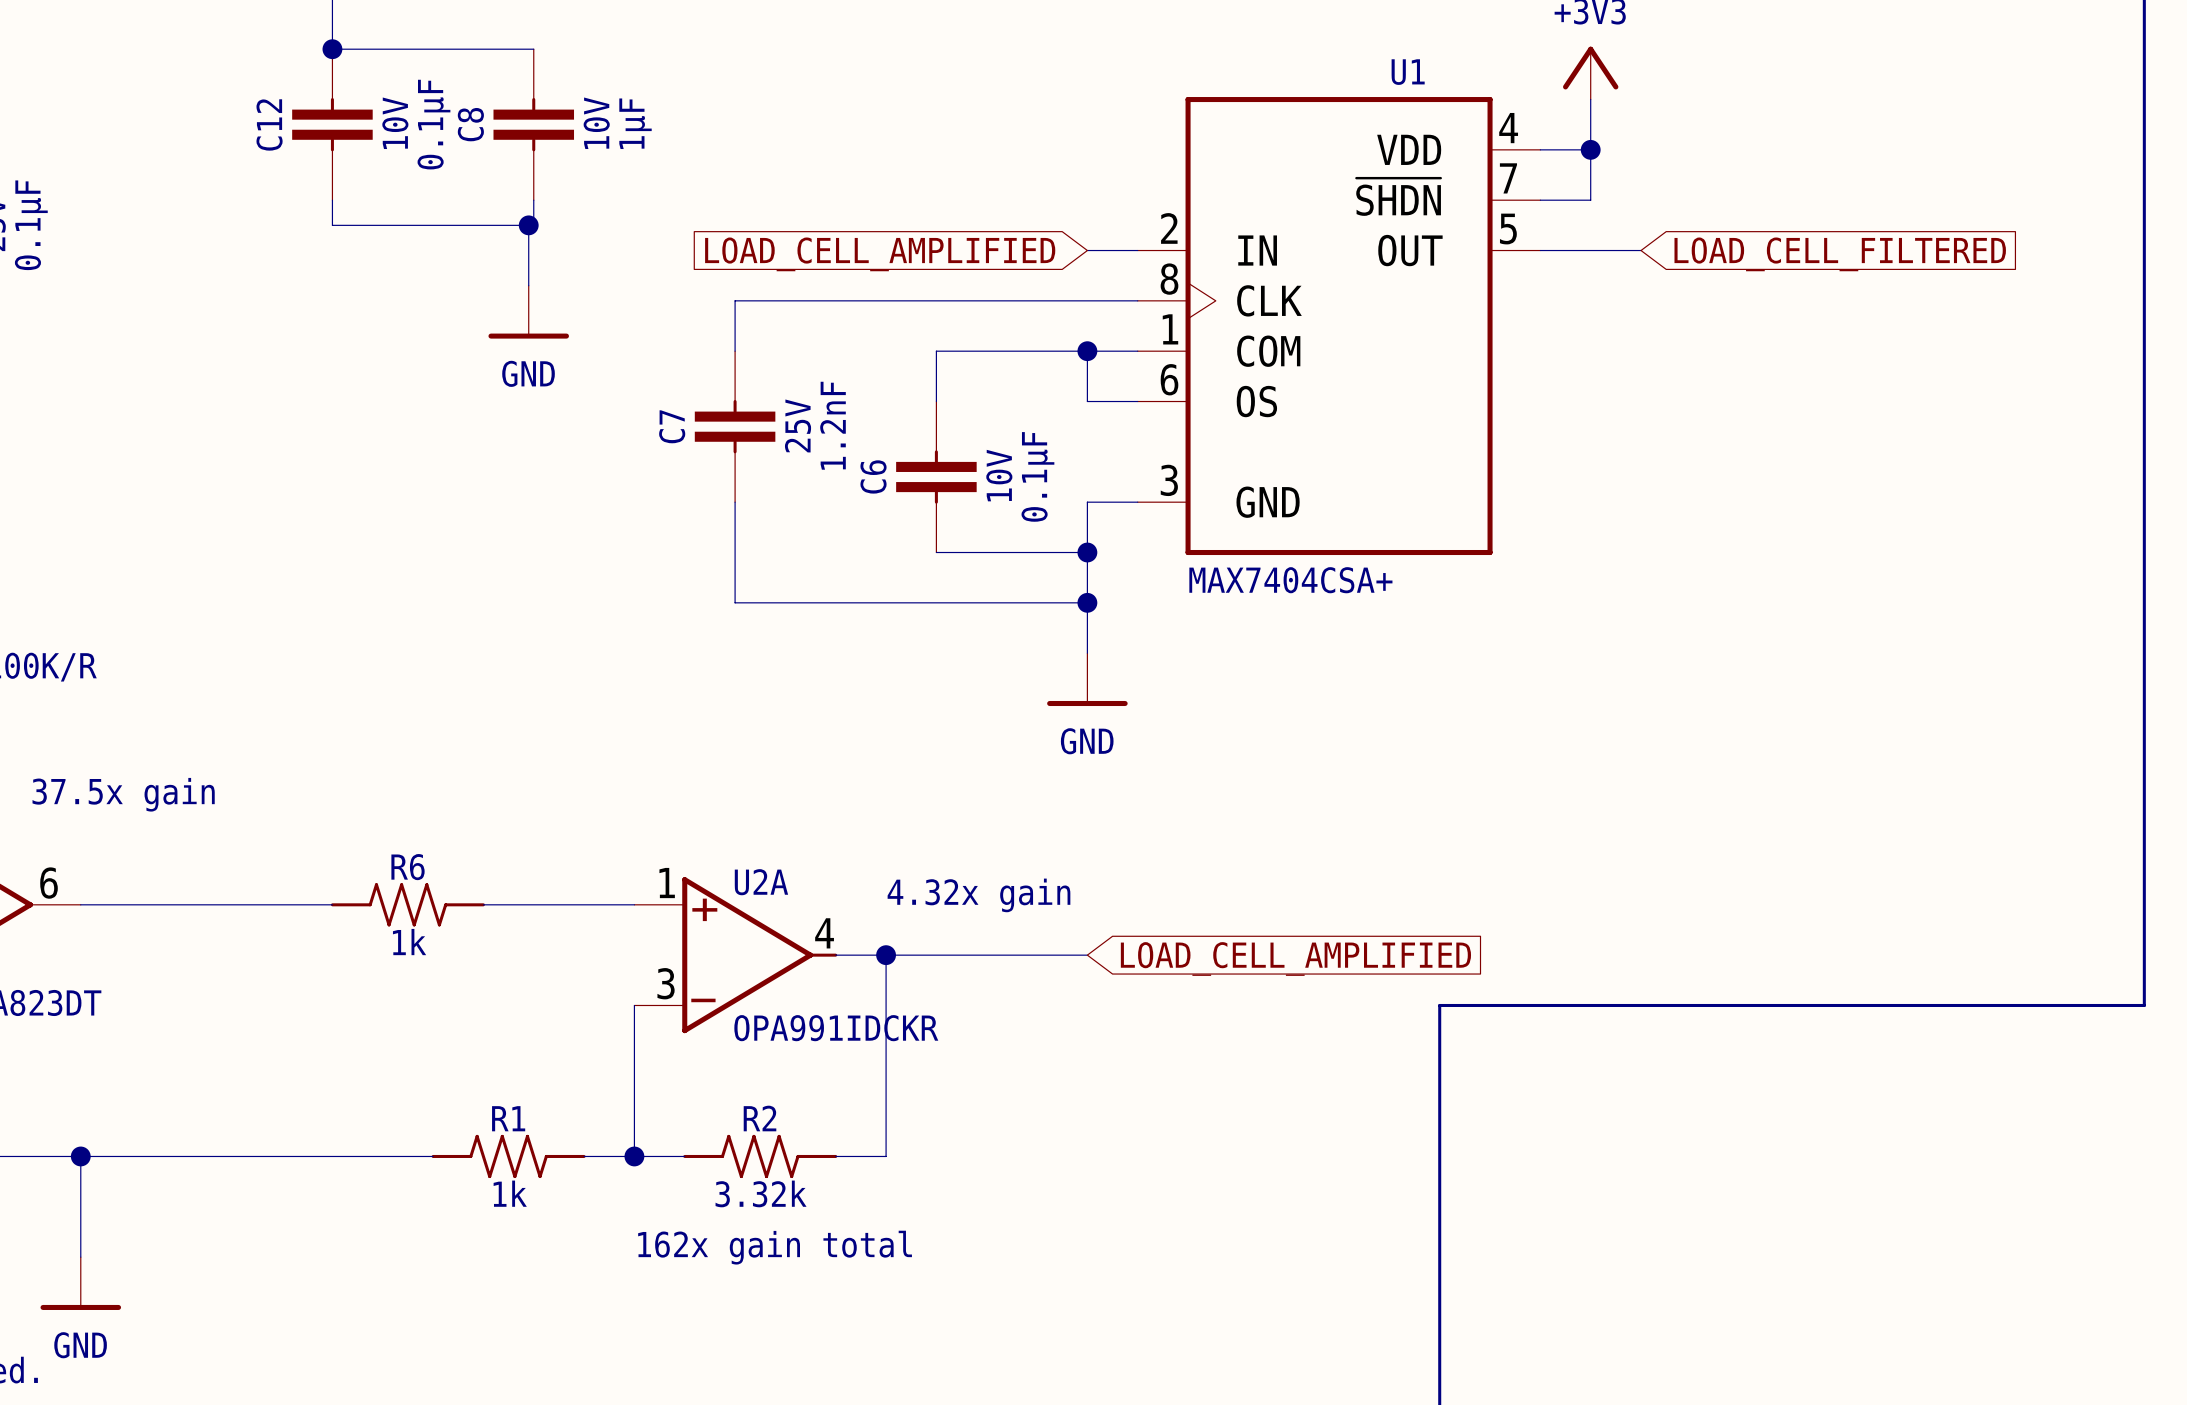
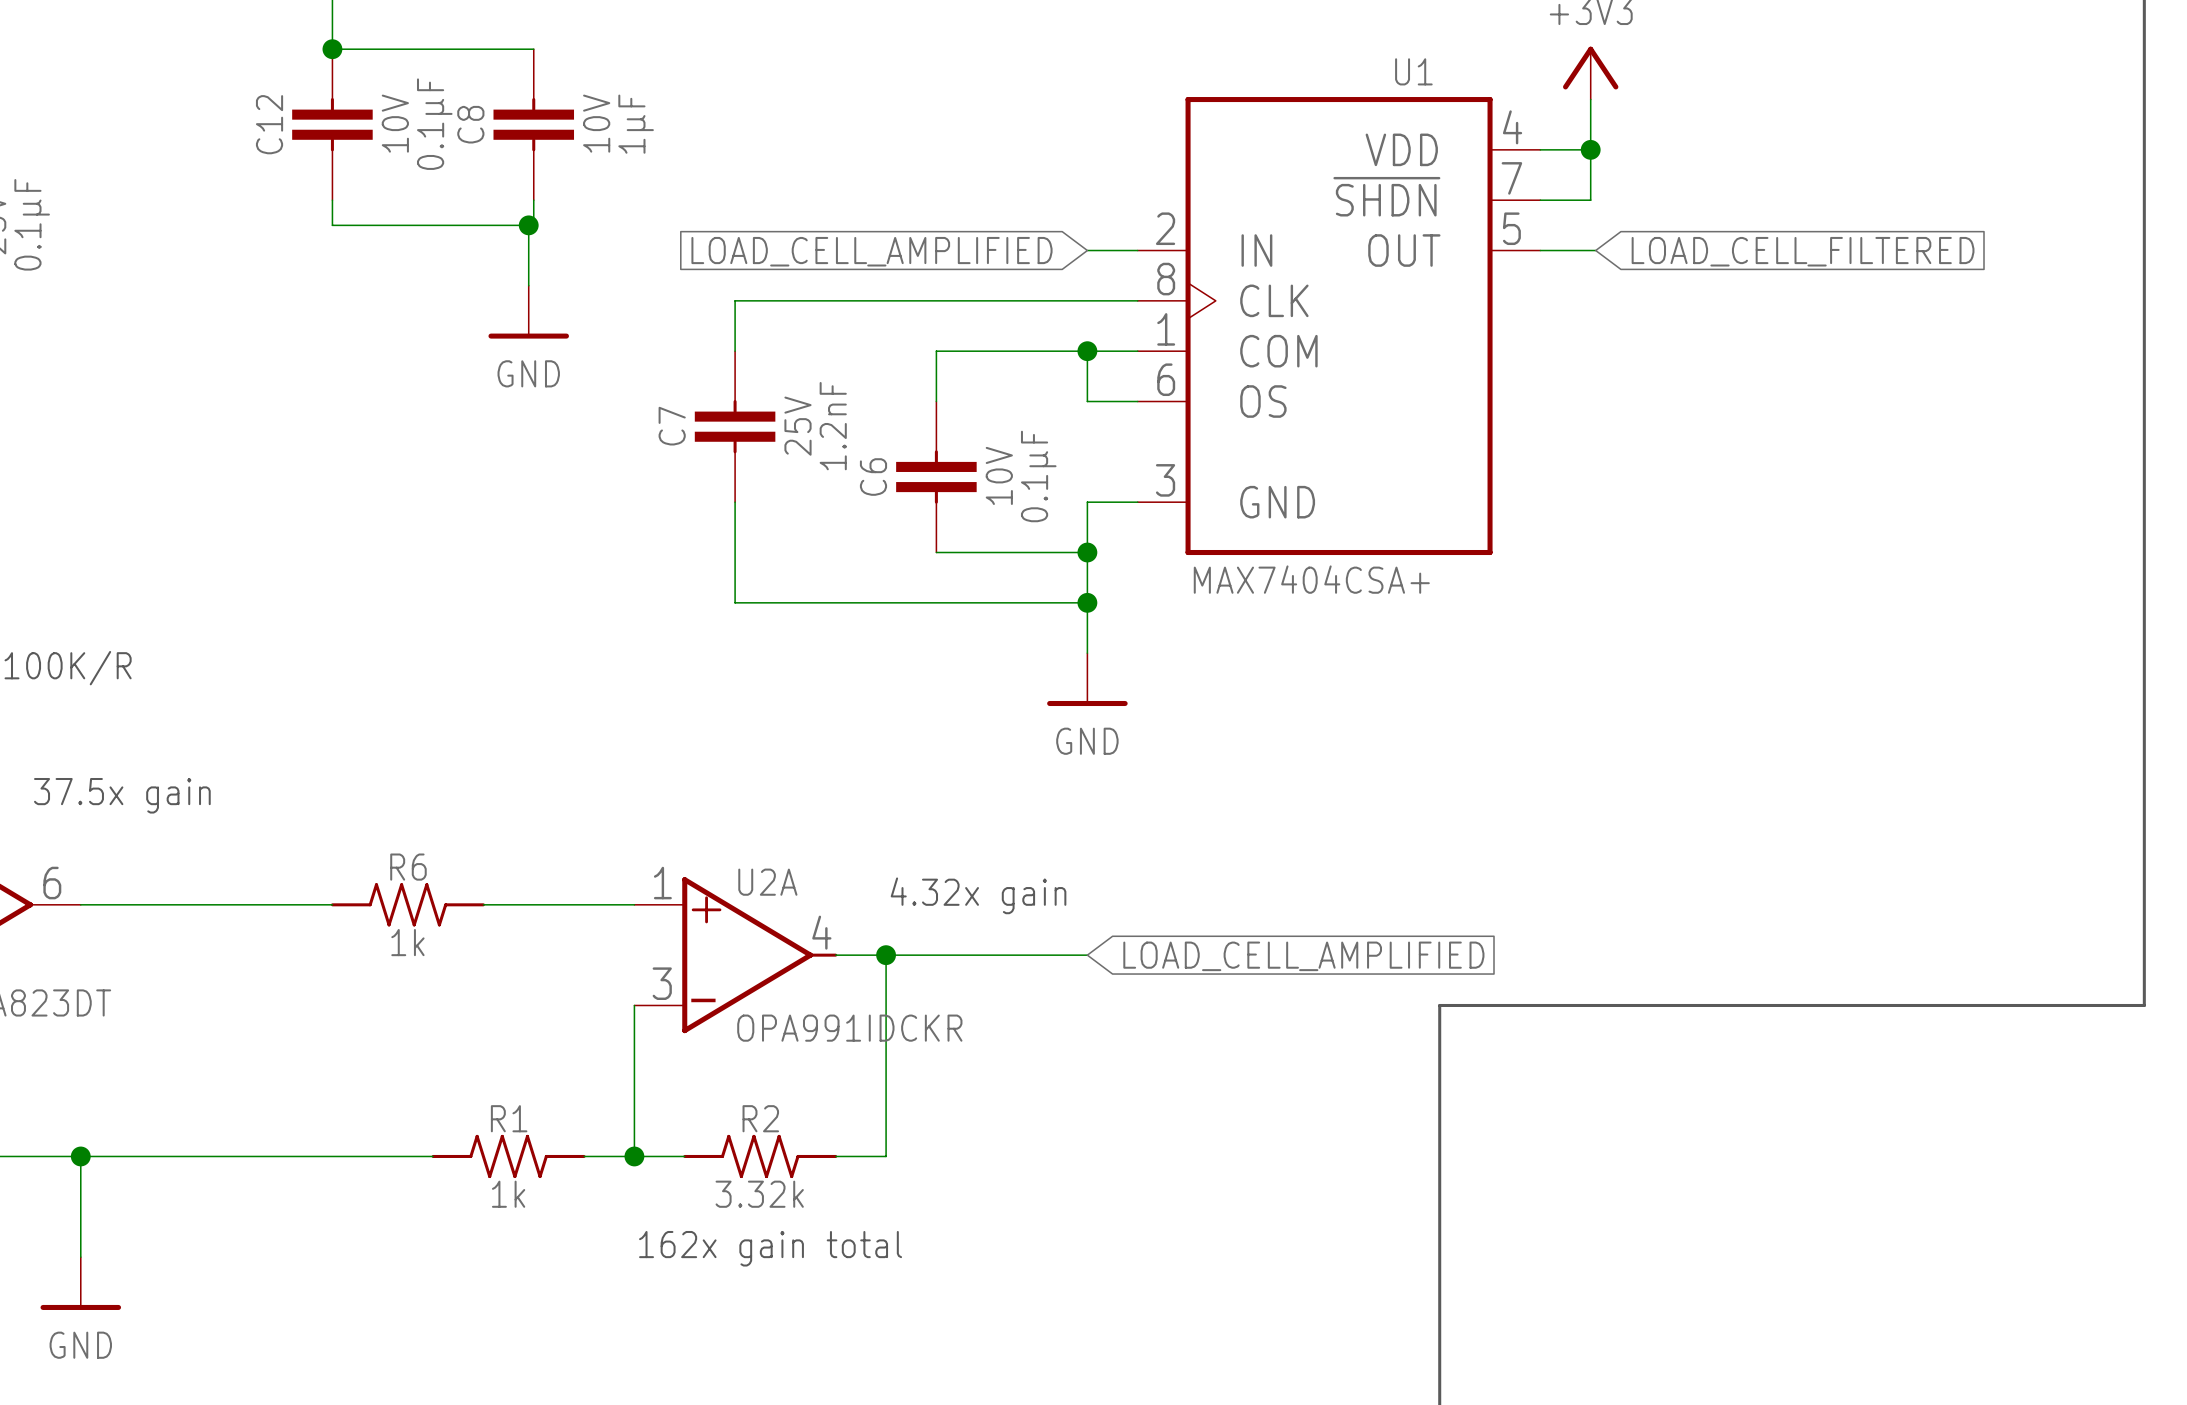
wire: (1595, 250) (1641, 250) -> none
global label position: LOAD_CELL_FILTERED (1840, 254) -> LOAD_CELL_FILTERED (1803, 251)

